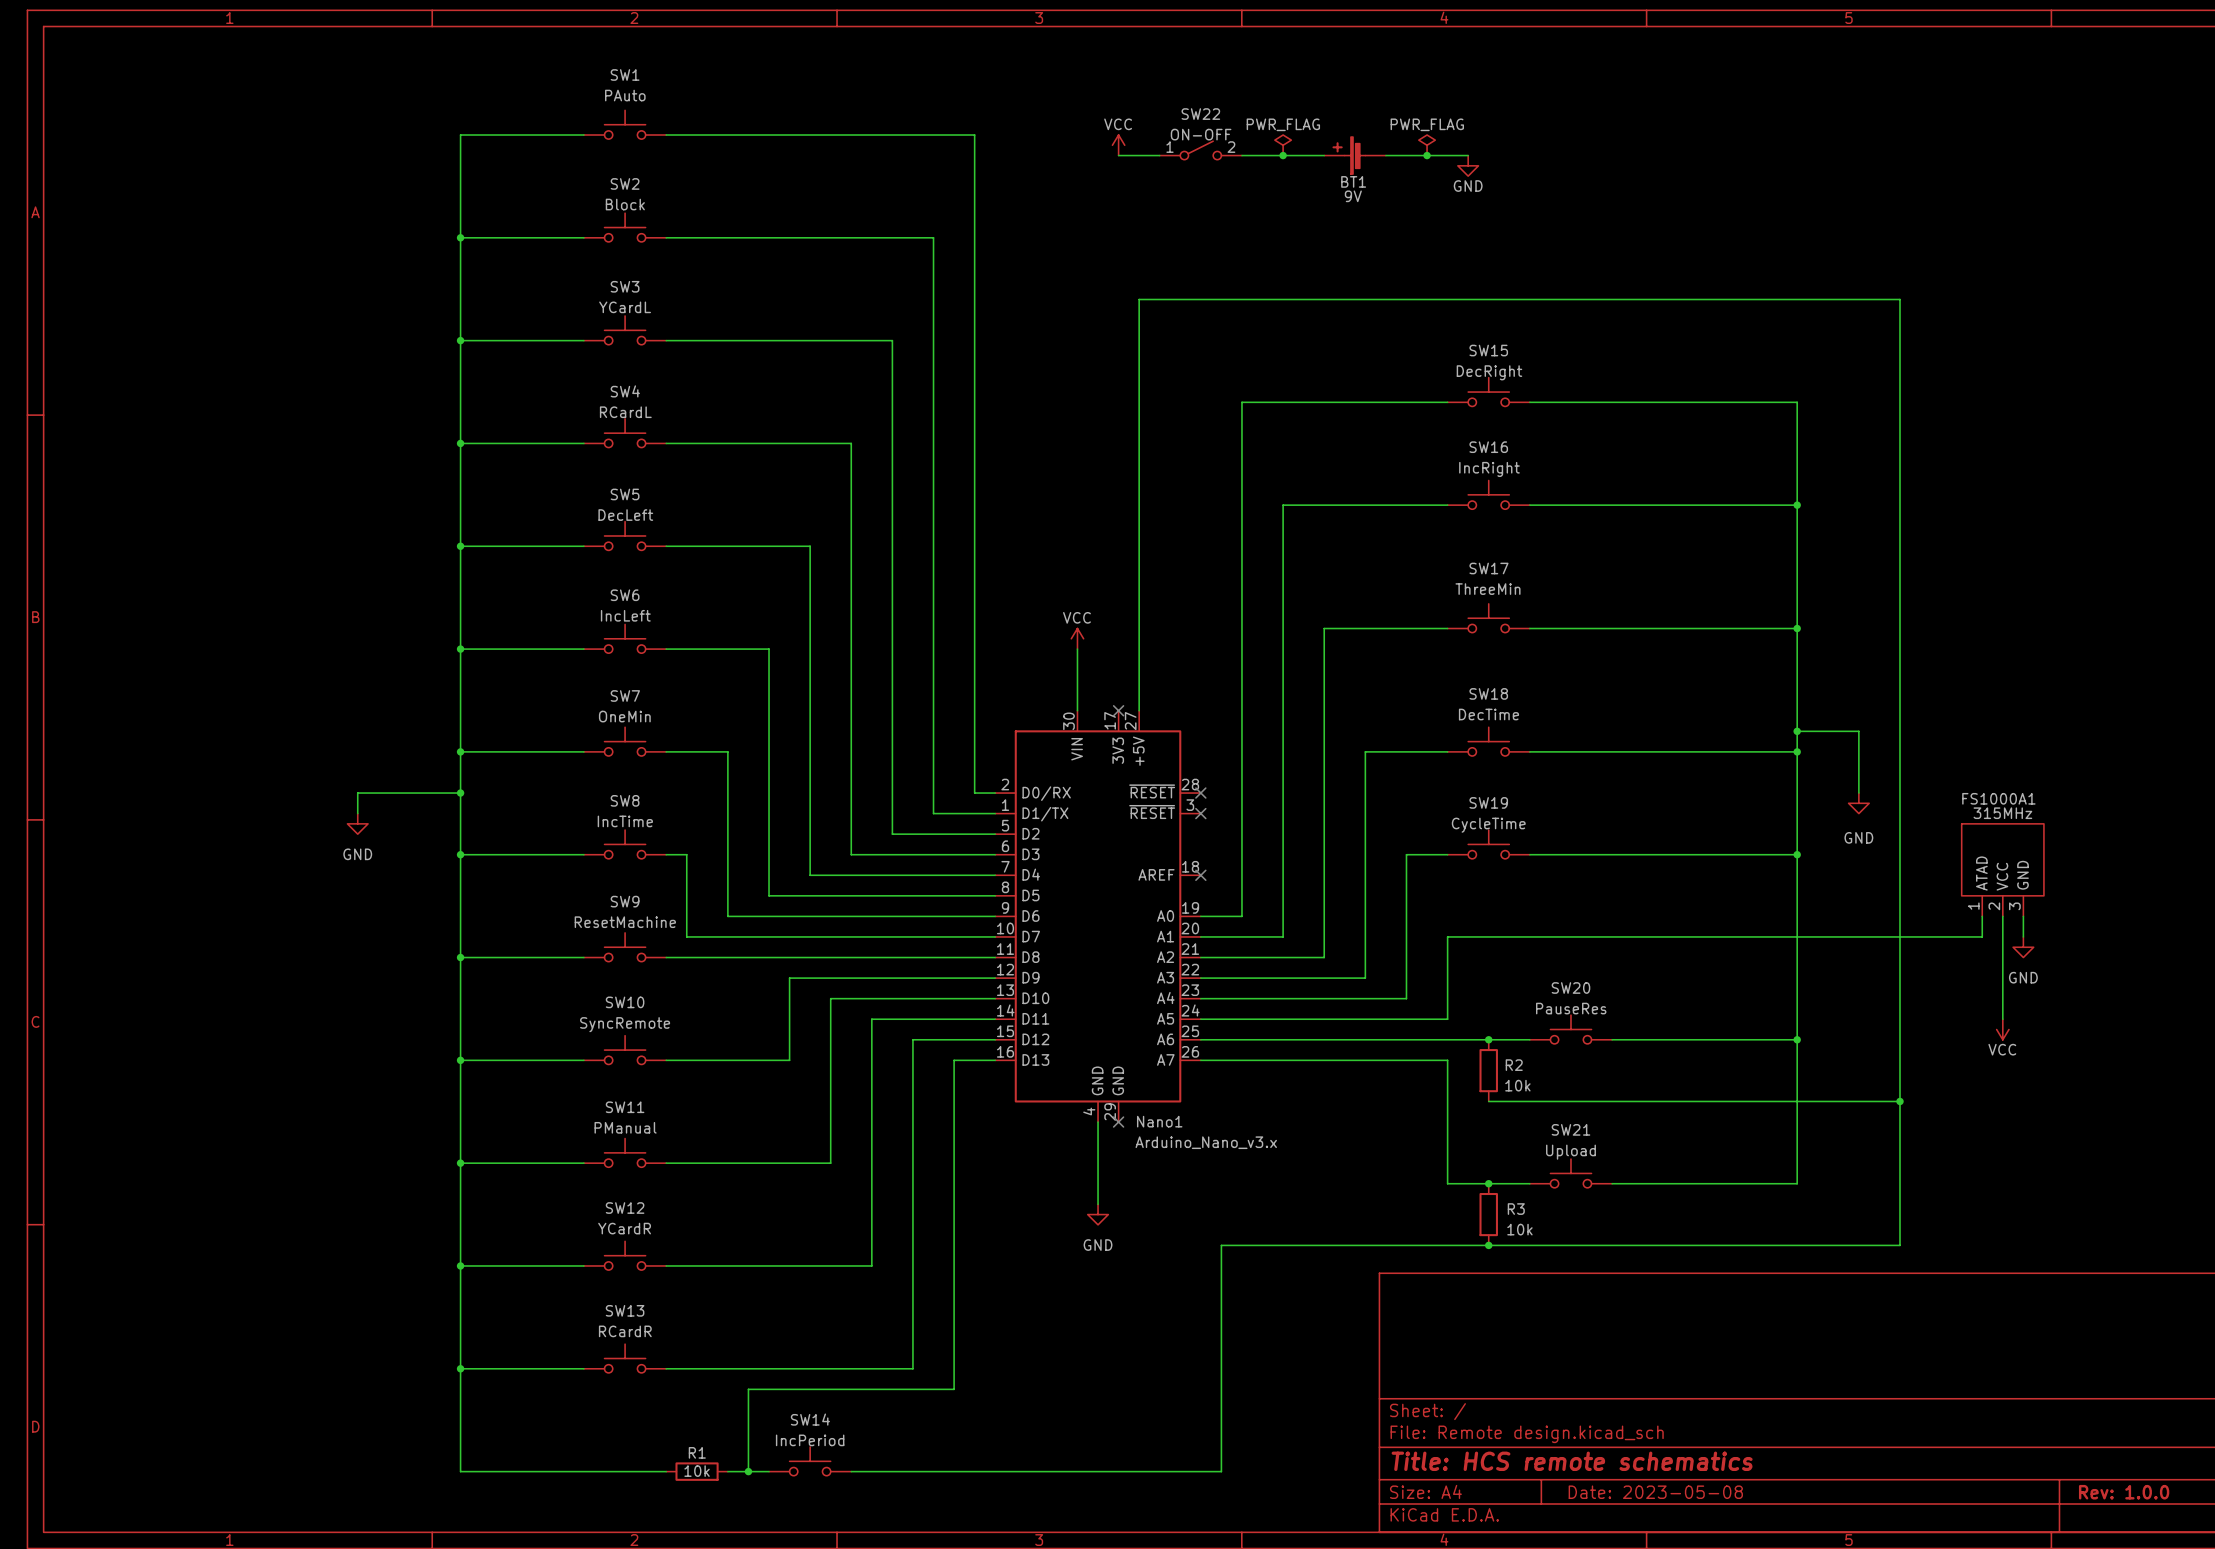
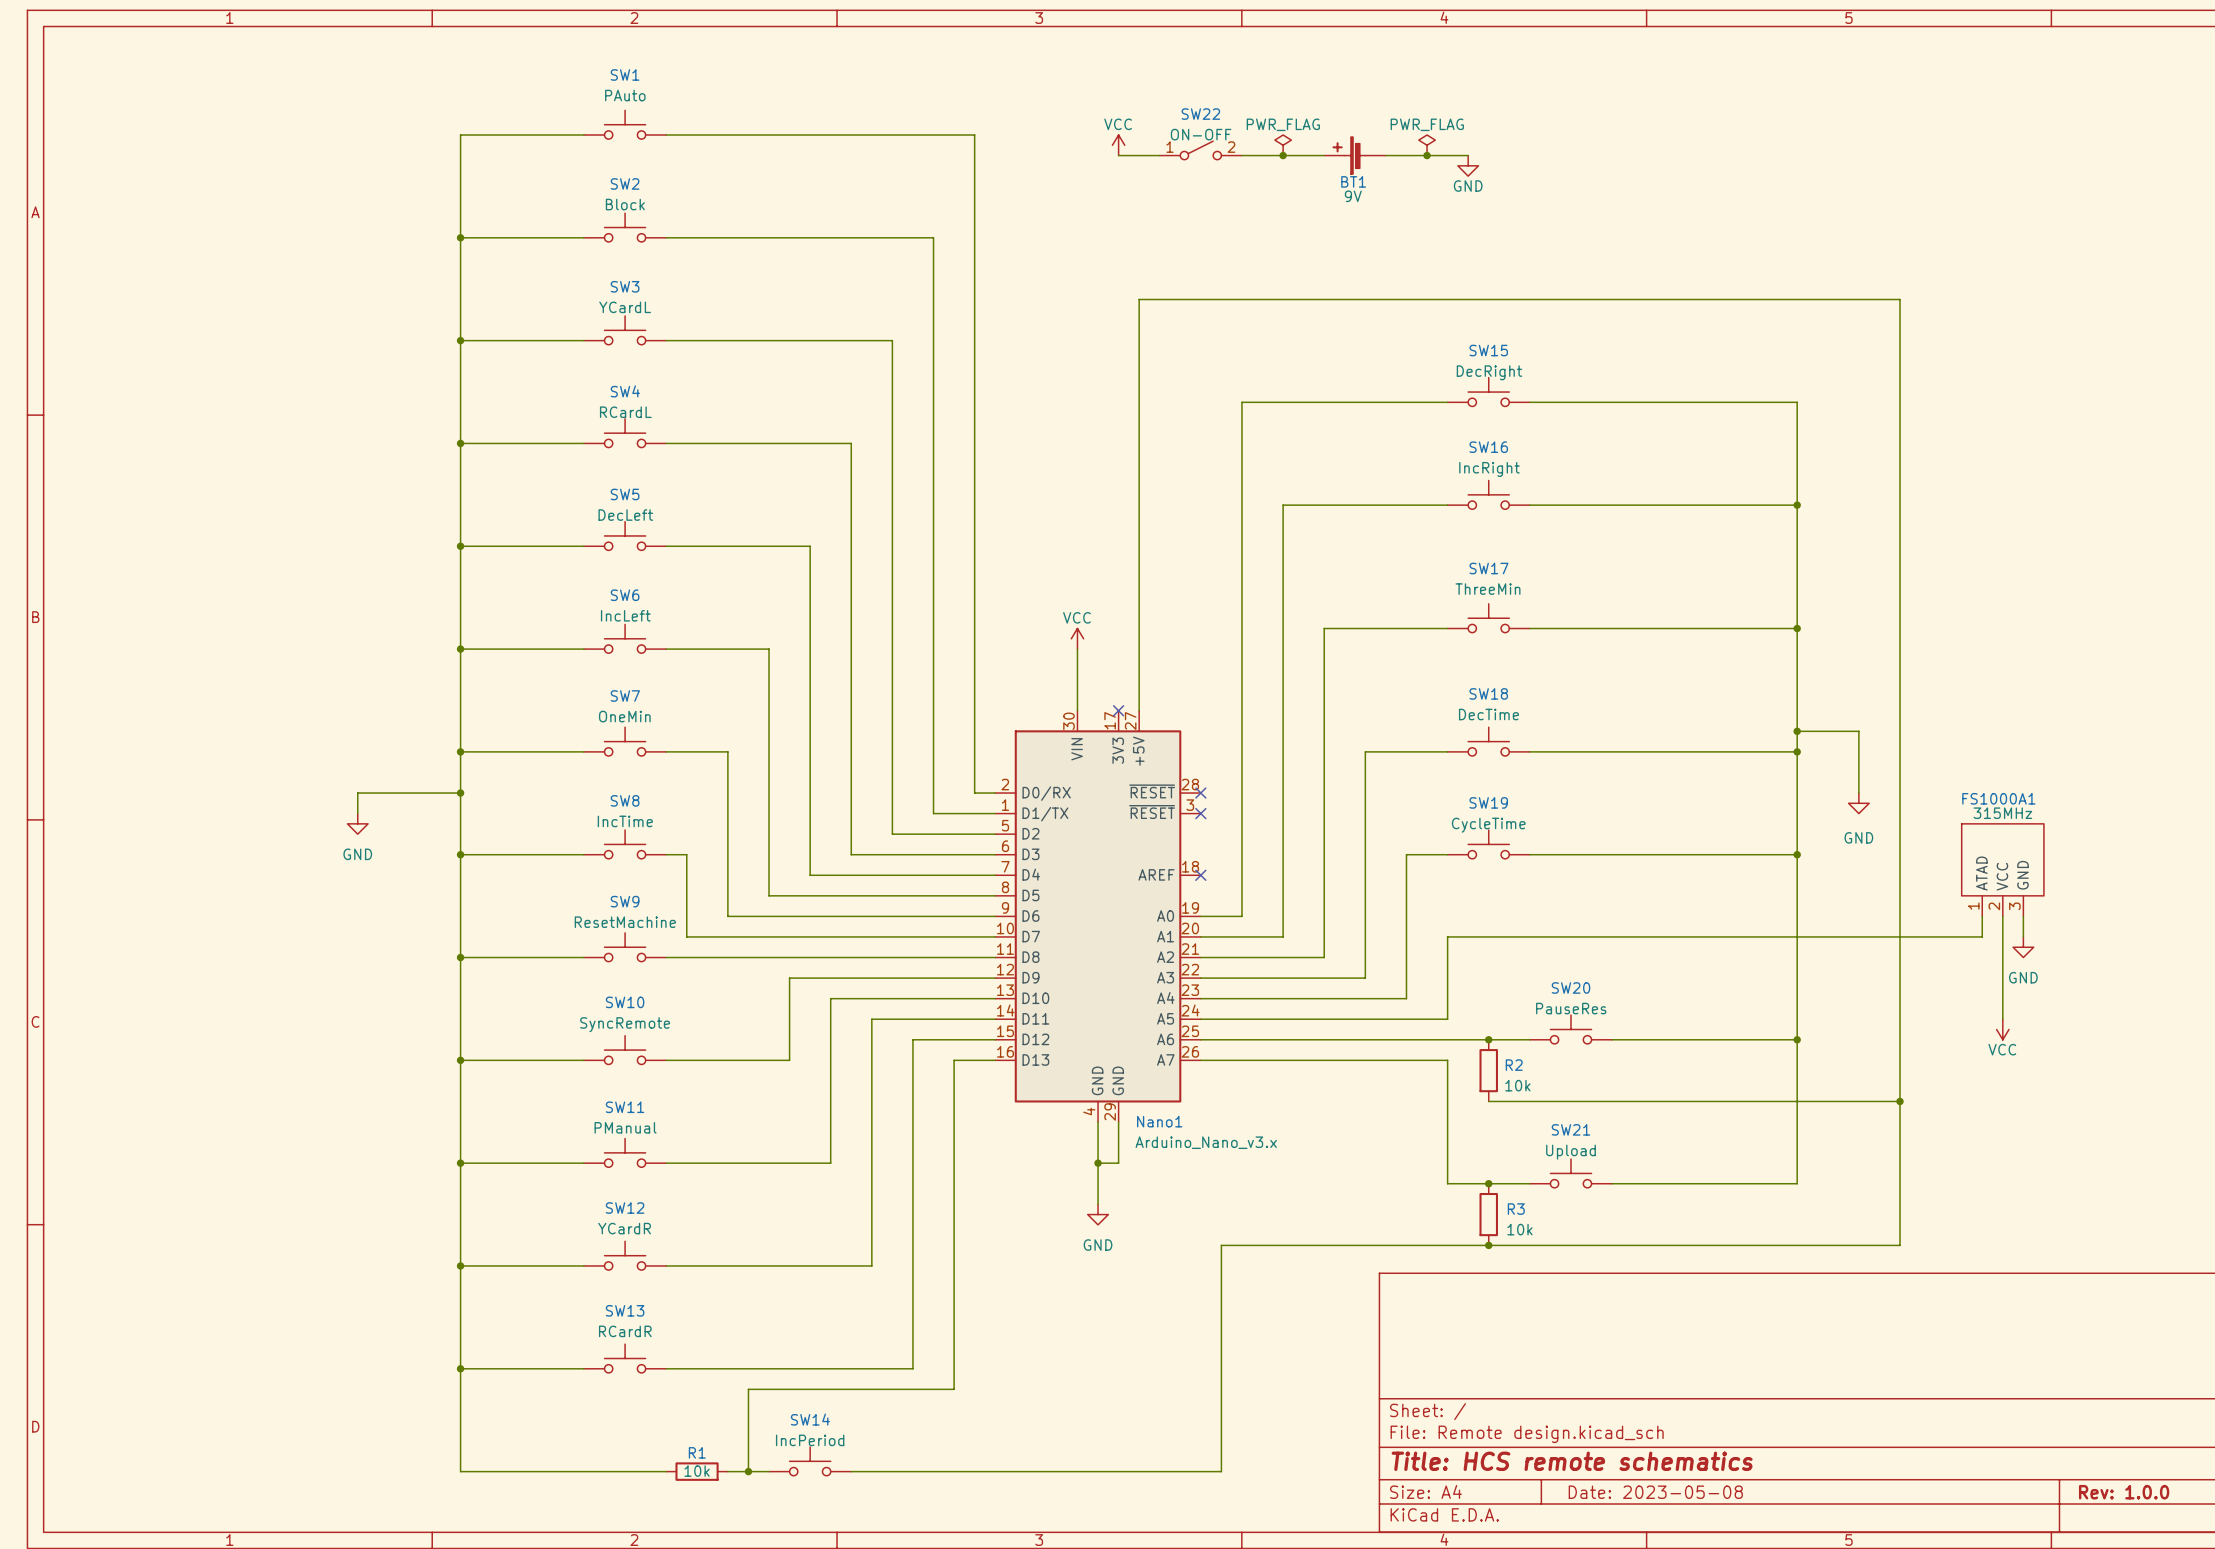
wire: none -> (1118, 1122) (1118, 1163) (1098, 1163)
no-connect mark: (1118, 1122) -> none
junction: none -> (1098, 1163)

